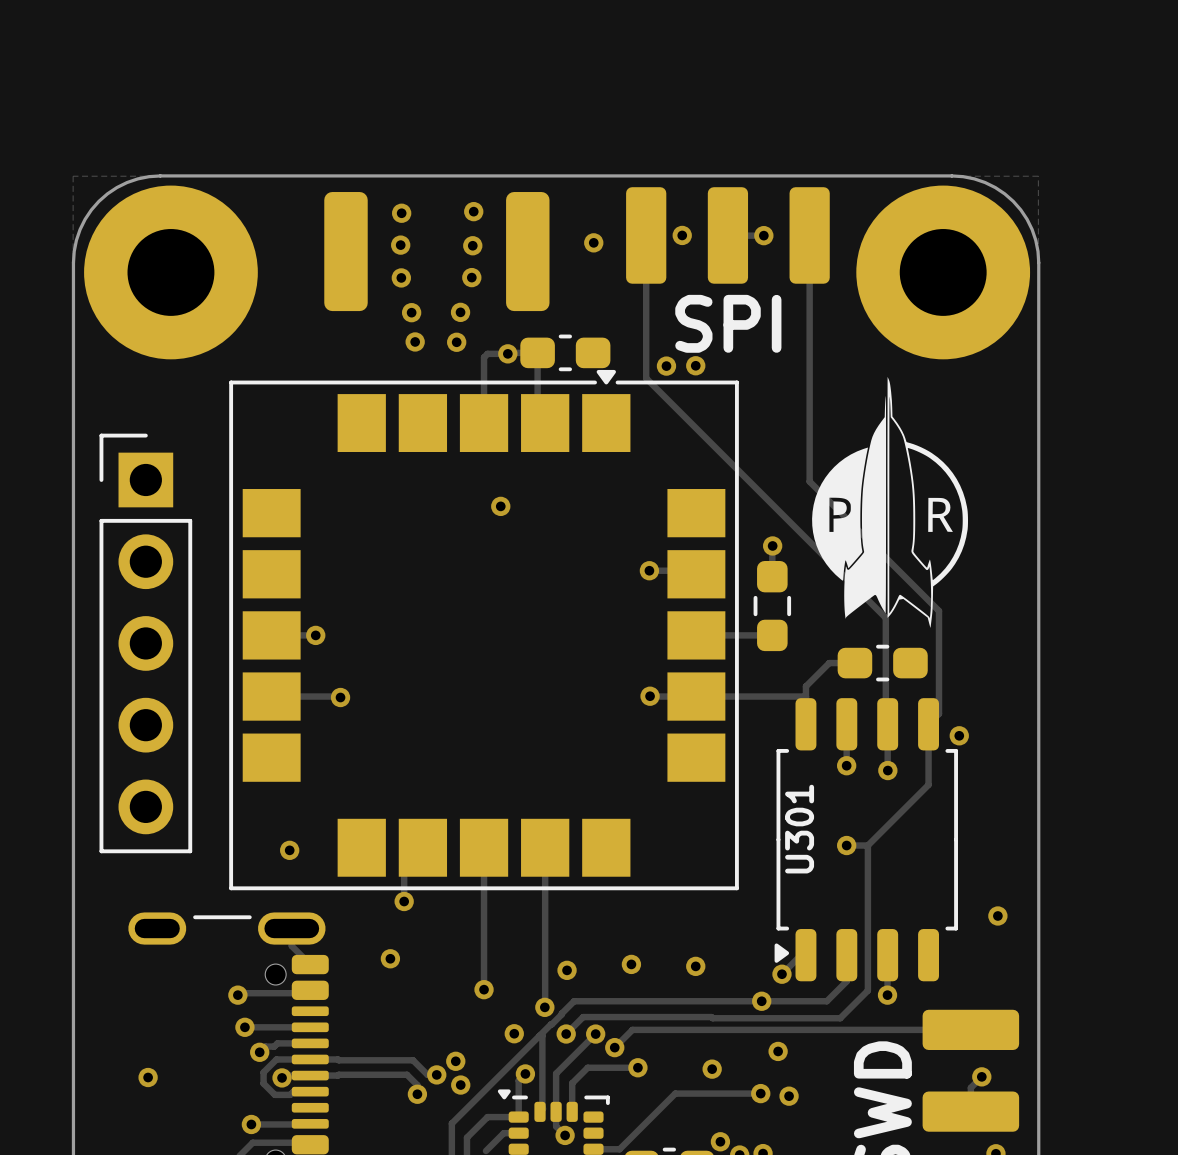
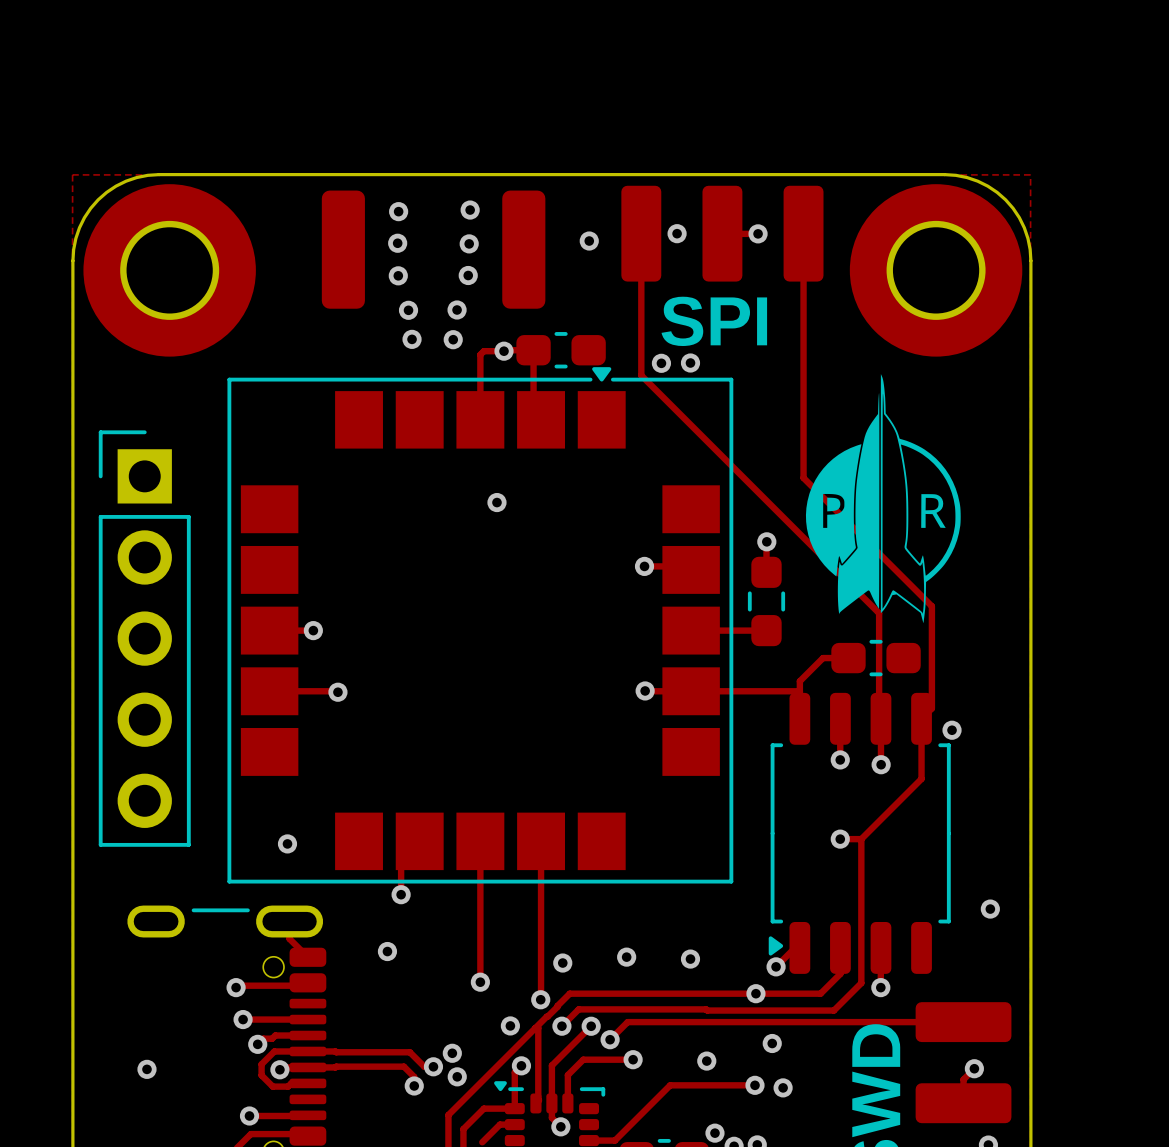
U301 name: U301 (799, 829) -> none

